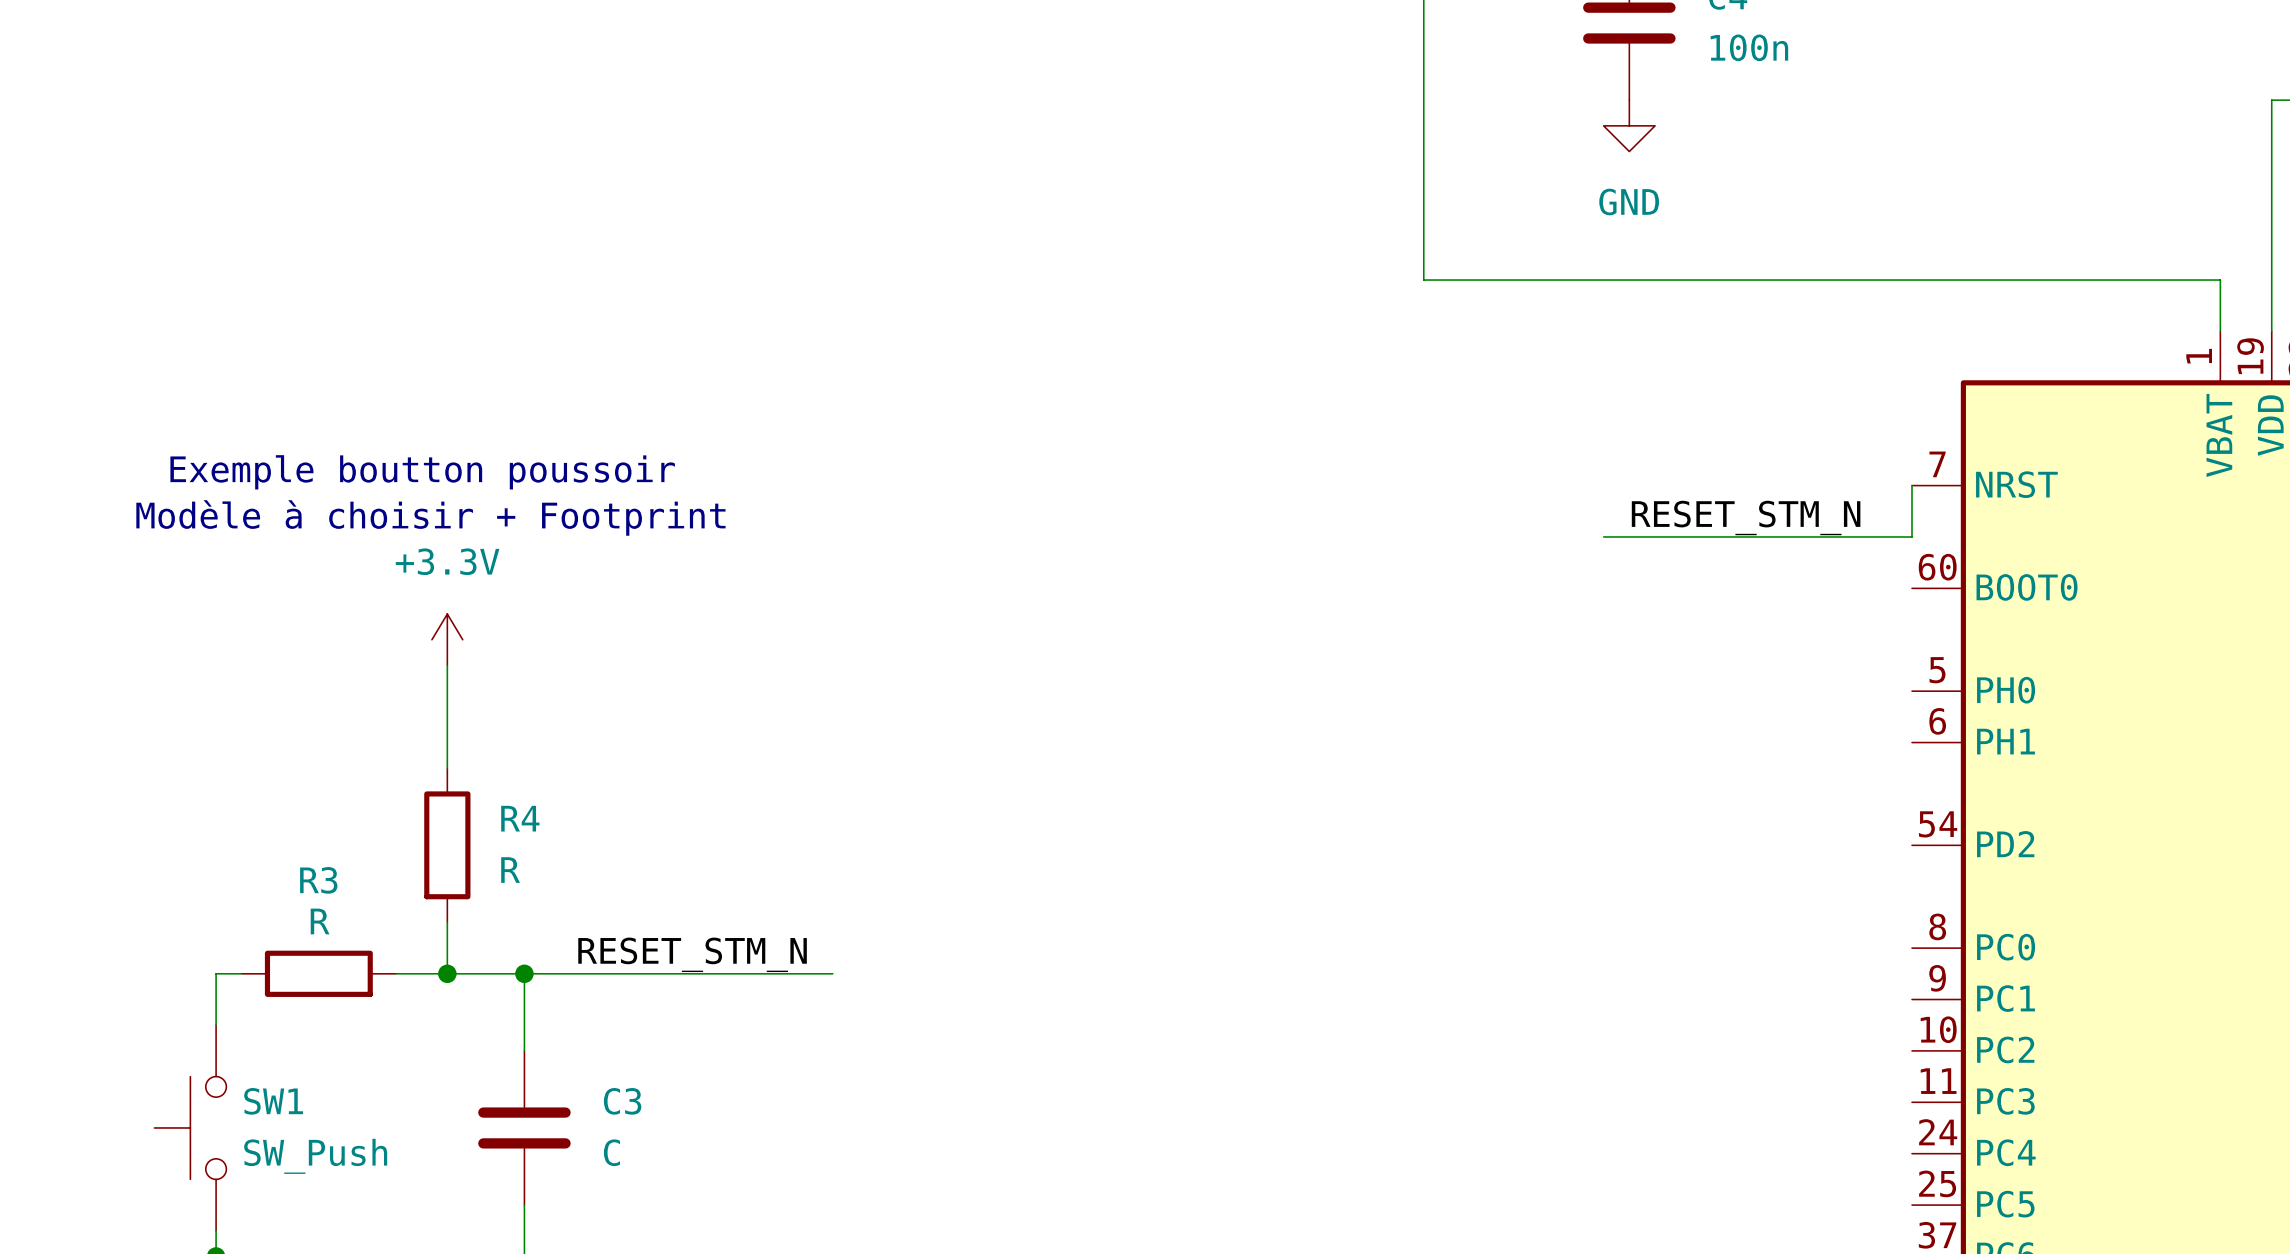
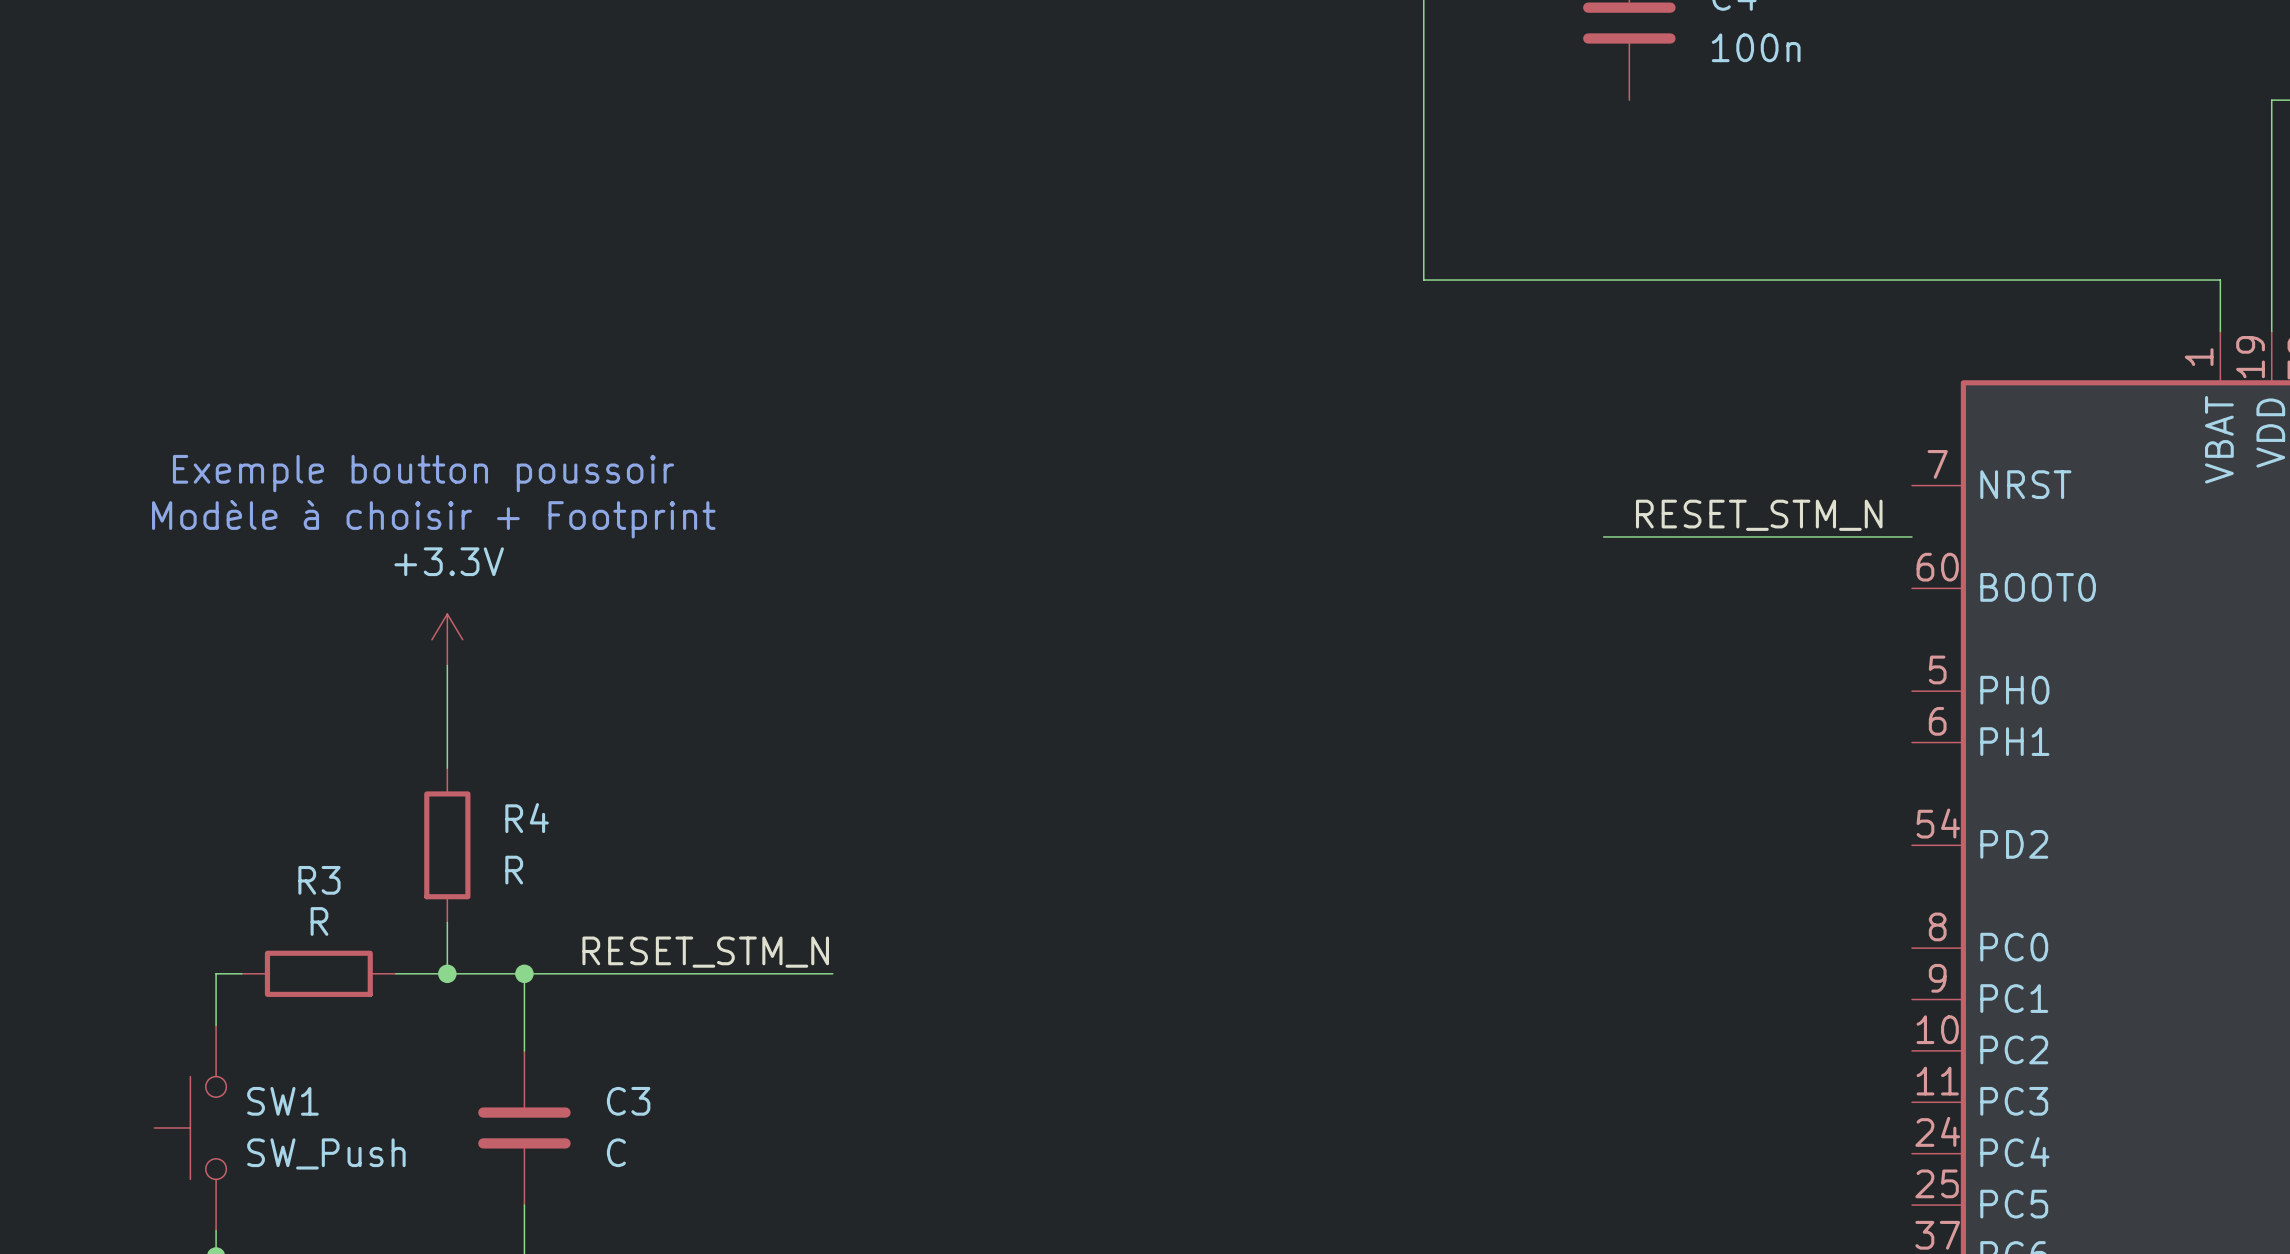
power symbol: GND (1629, 125) -> none
wire: (1912, 485) (1912, 536) -> none

